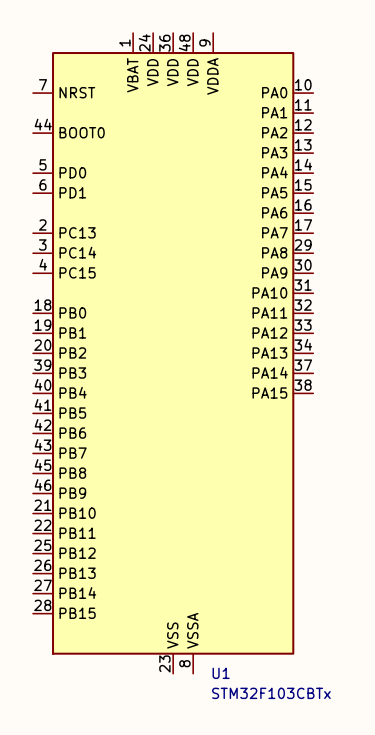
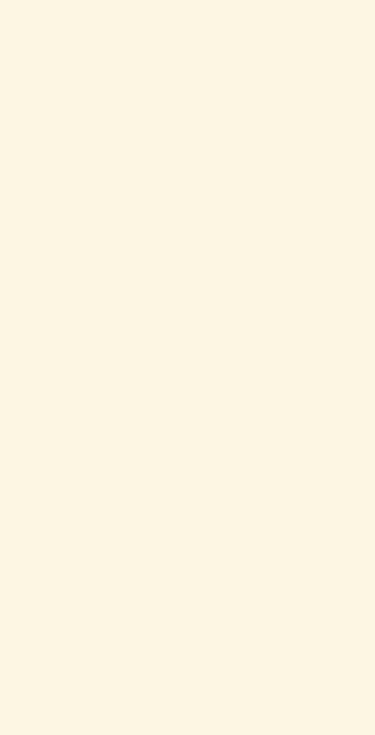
U1: STM32F103CBTx (173, 353) -> none

